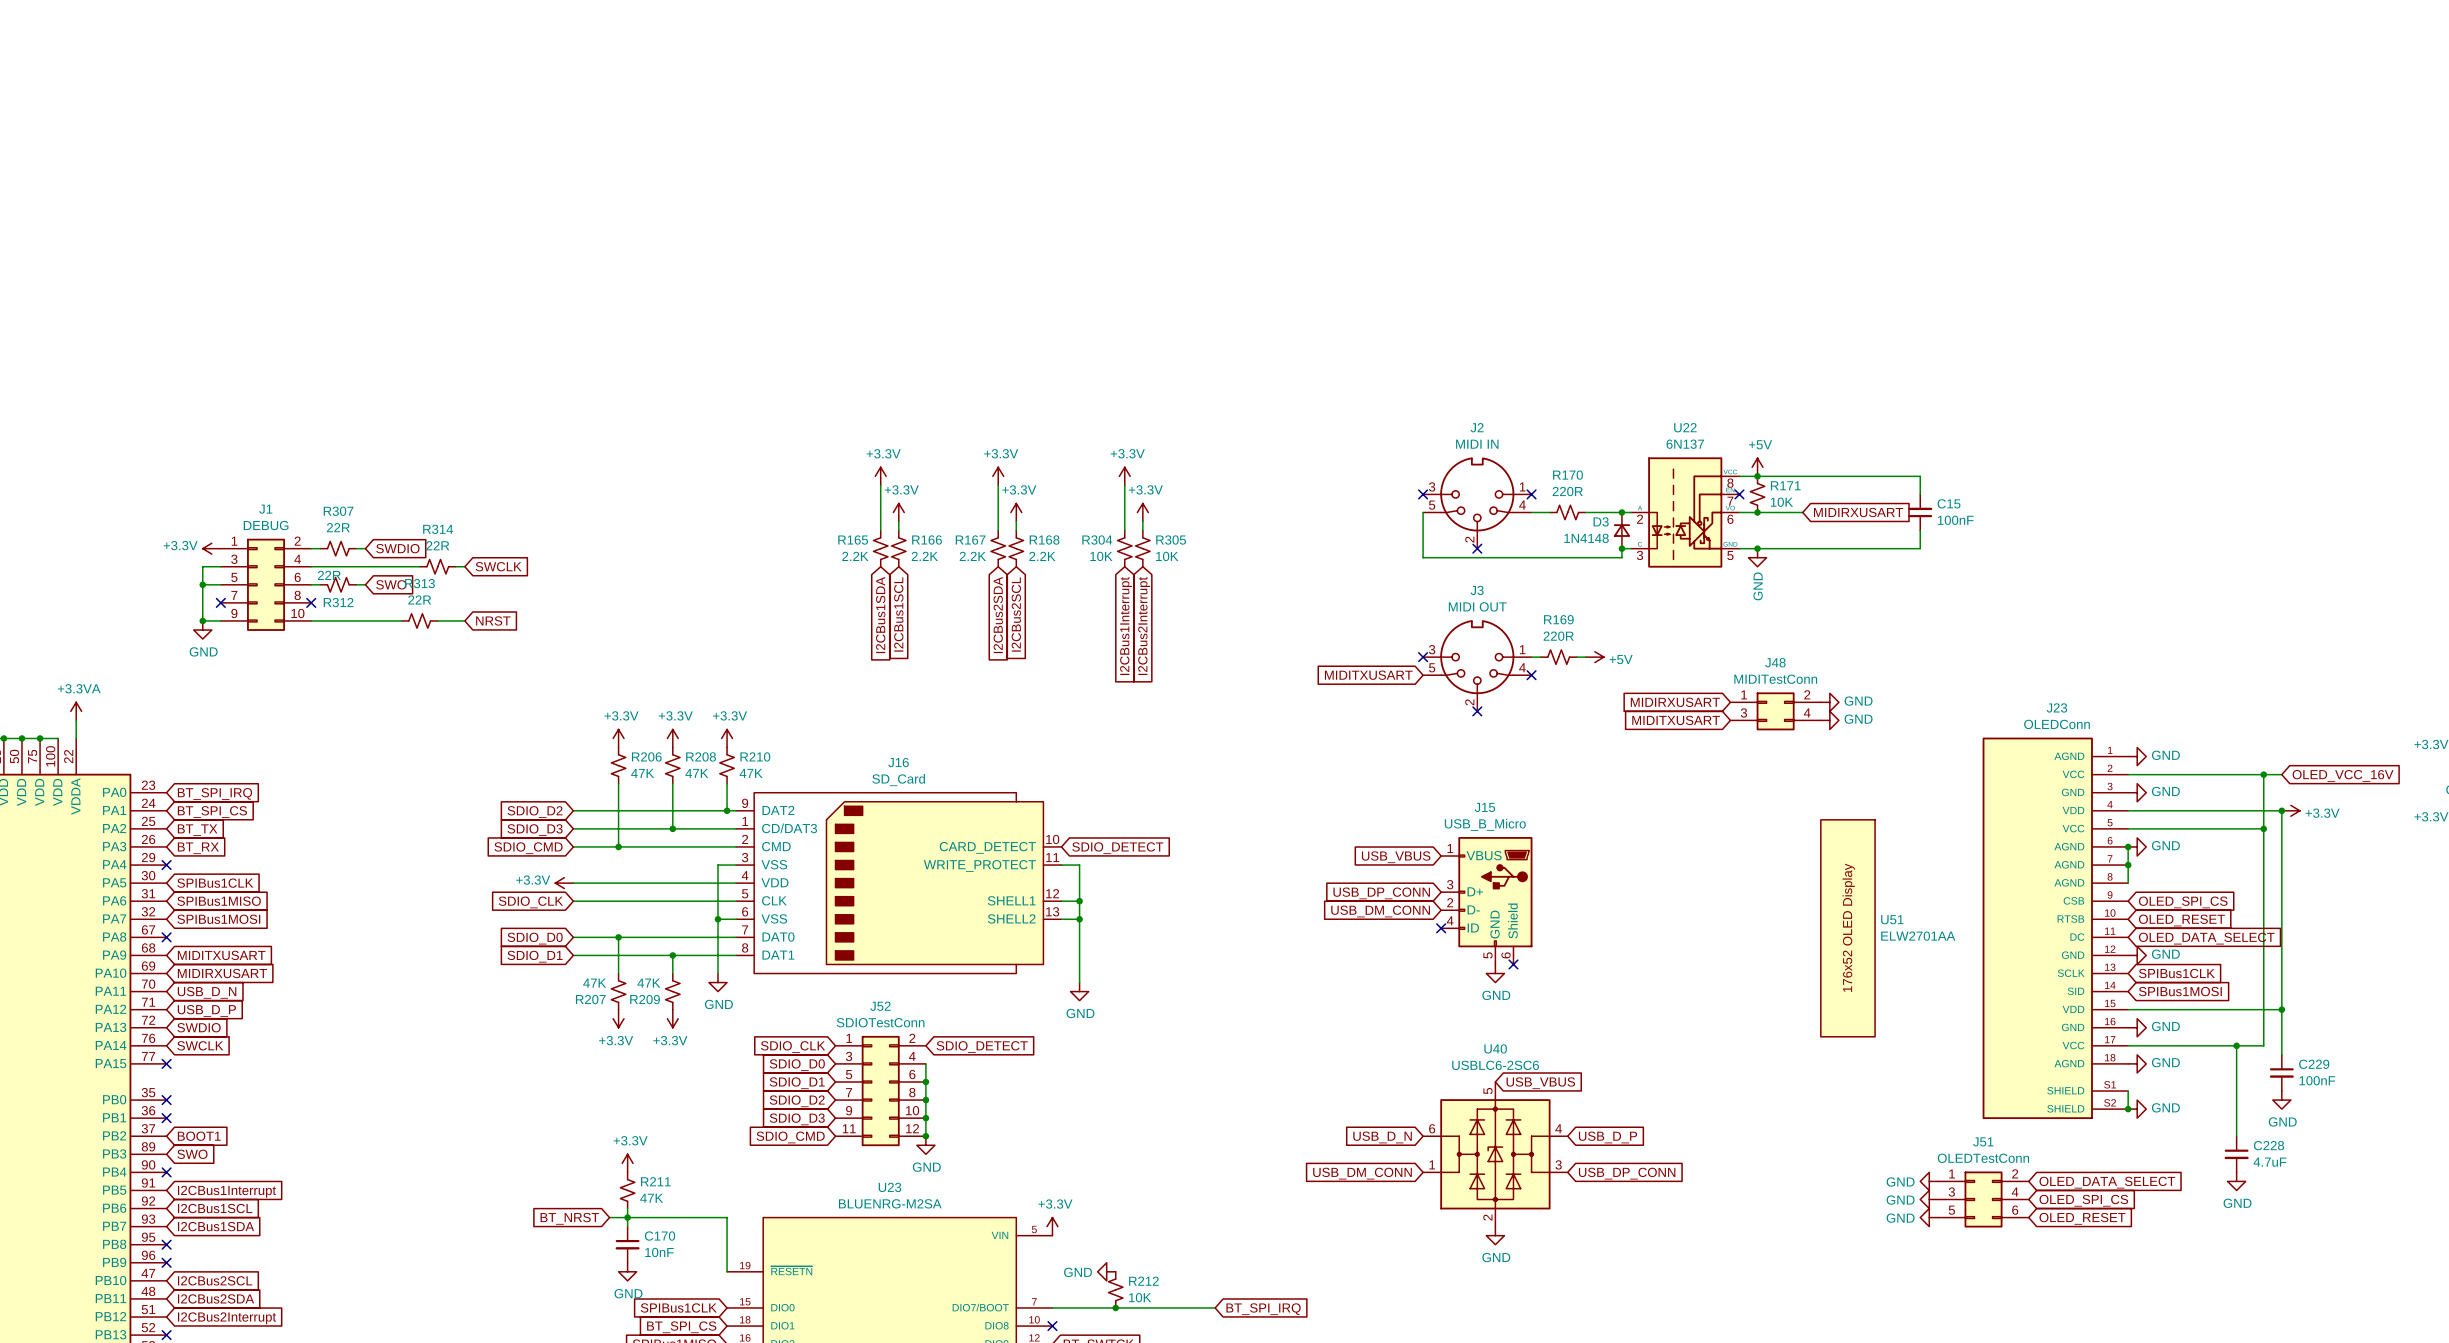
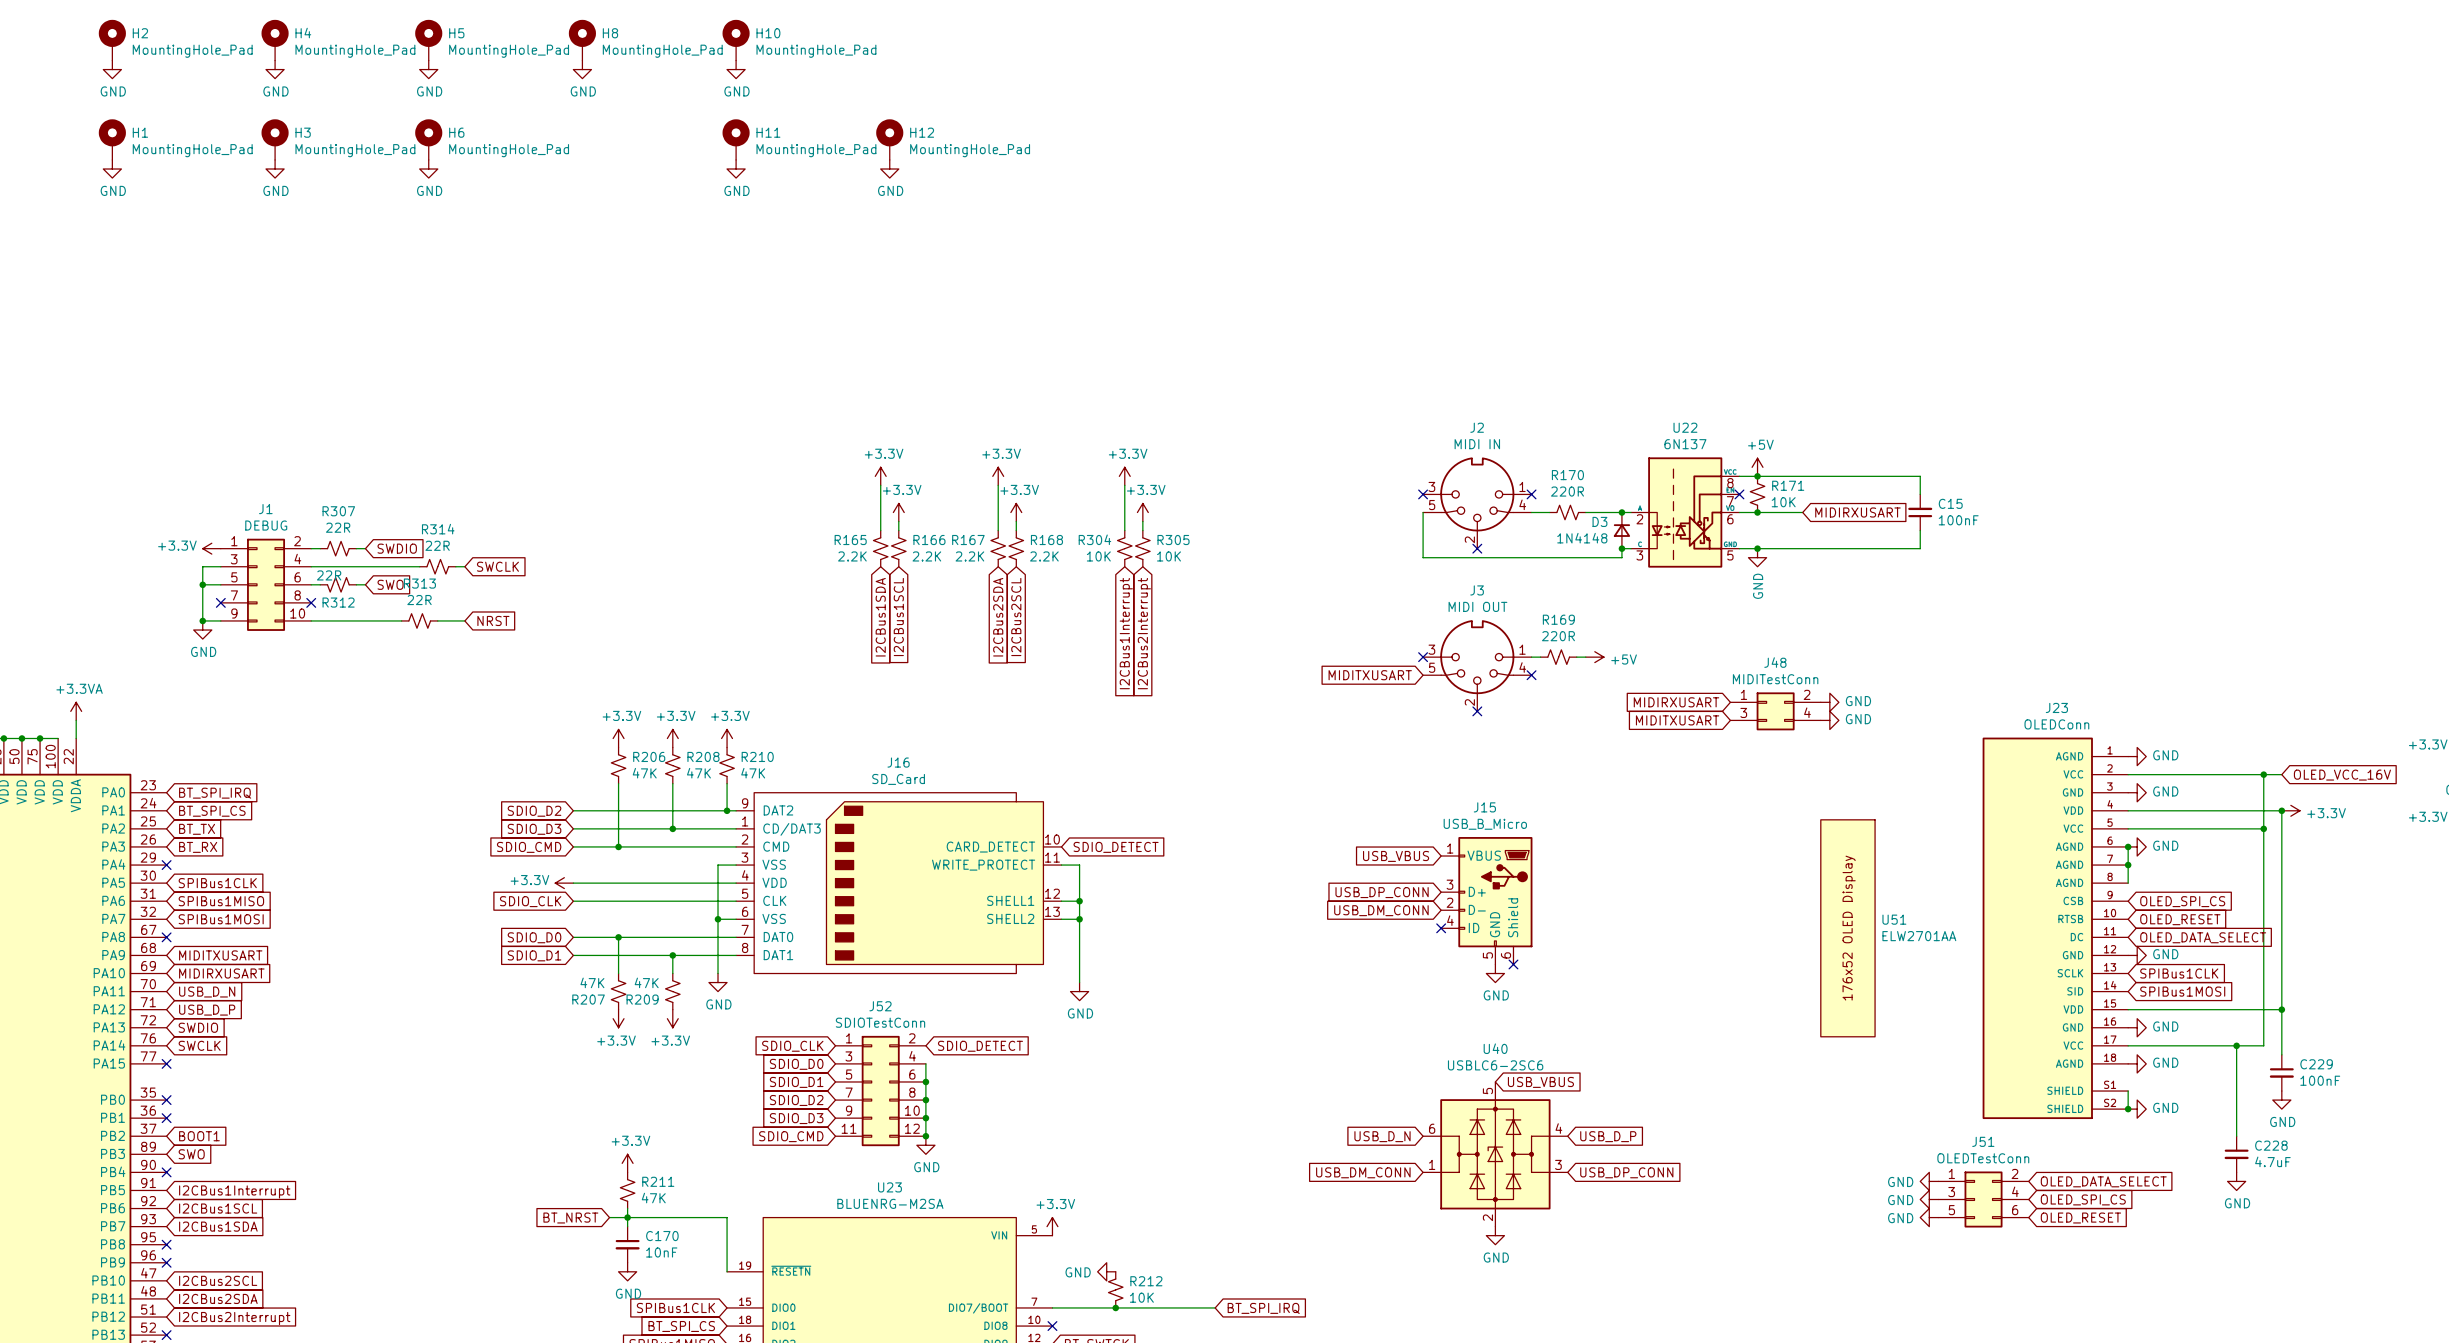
H2: none -> MountingHole_Pad (112, 40)
H4: none -> MountingHole_Pad (275, 40)
H5: none -> MountingHole_Pad (428, 40)
H8: none -> MountingHole_Pad (582, 40)
H10: none -> MountingHole_Pad (736, 40)
power symbol: none -> GND (112, 69)
power symbol: none -> GND (275, 69)
power symbol: none -> GND (428, 69)
power symbol: none -> GND (582, 69)
power symbol: none -> GND (736, 69)
H1: none -> MountingHole_Pad (112, 139)
H3: none -> MountingHole_Pad (275, 139)
H6: none -> MountingHole_Pad (428, 139)
H11: none -> MountingHole_Pad (736, 139)
H12: none -> MountingHole_Pad (889, 139)
power symbol: none -> GND (112, 169)
power symbol: none -> GND (275, 169)
power symbol: none -> GND (428, 169)
power symbol: none -> GND (736, 169)
power symbol: none -> GND (889, 169)

